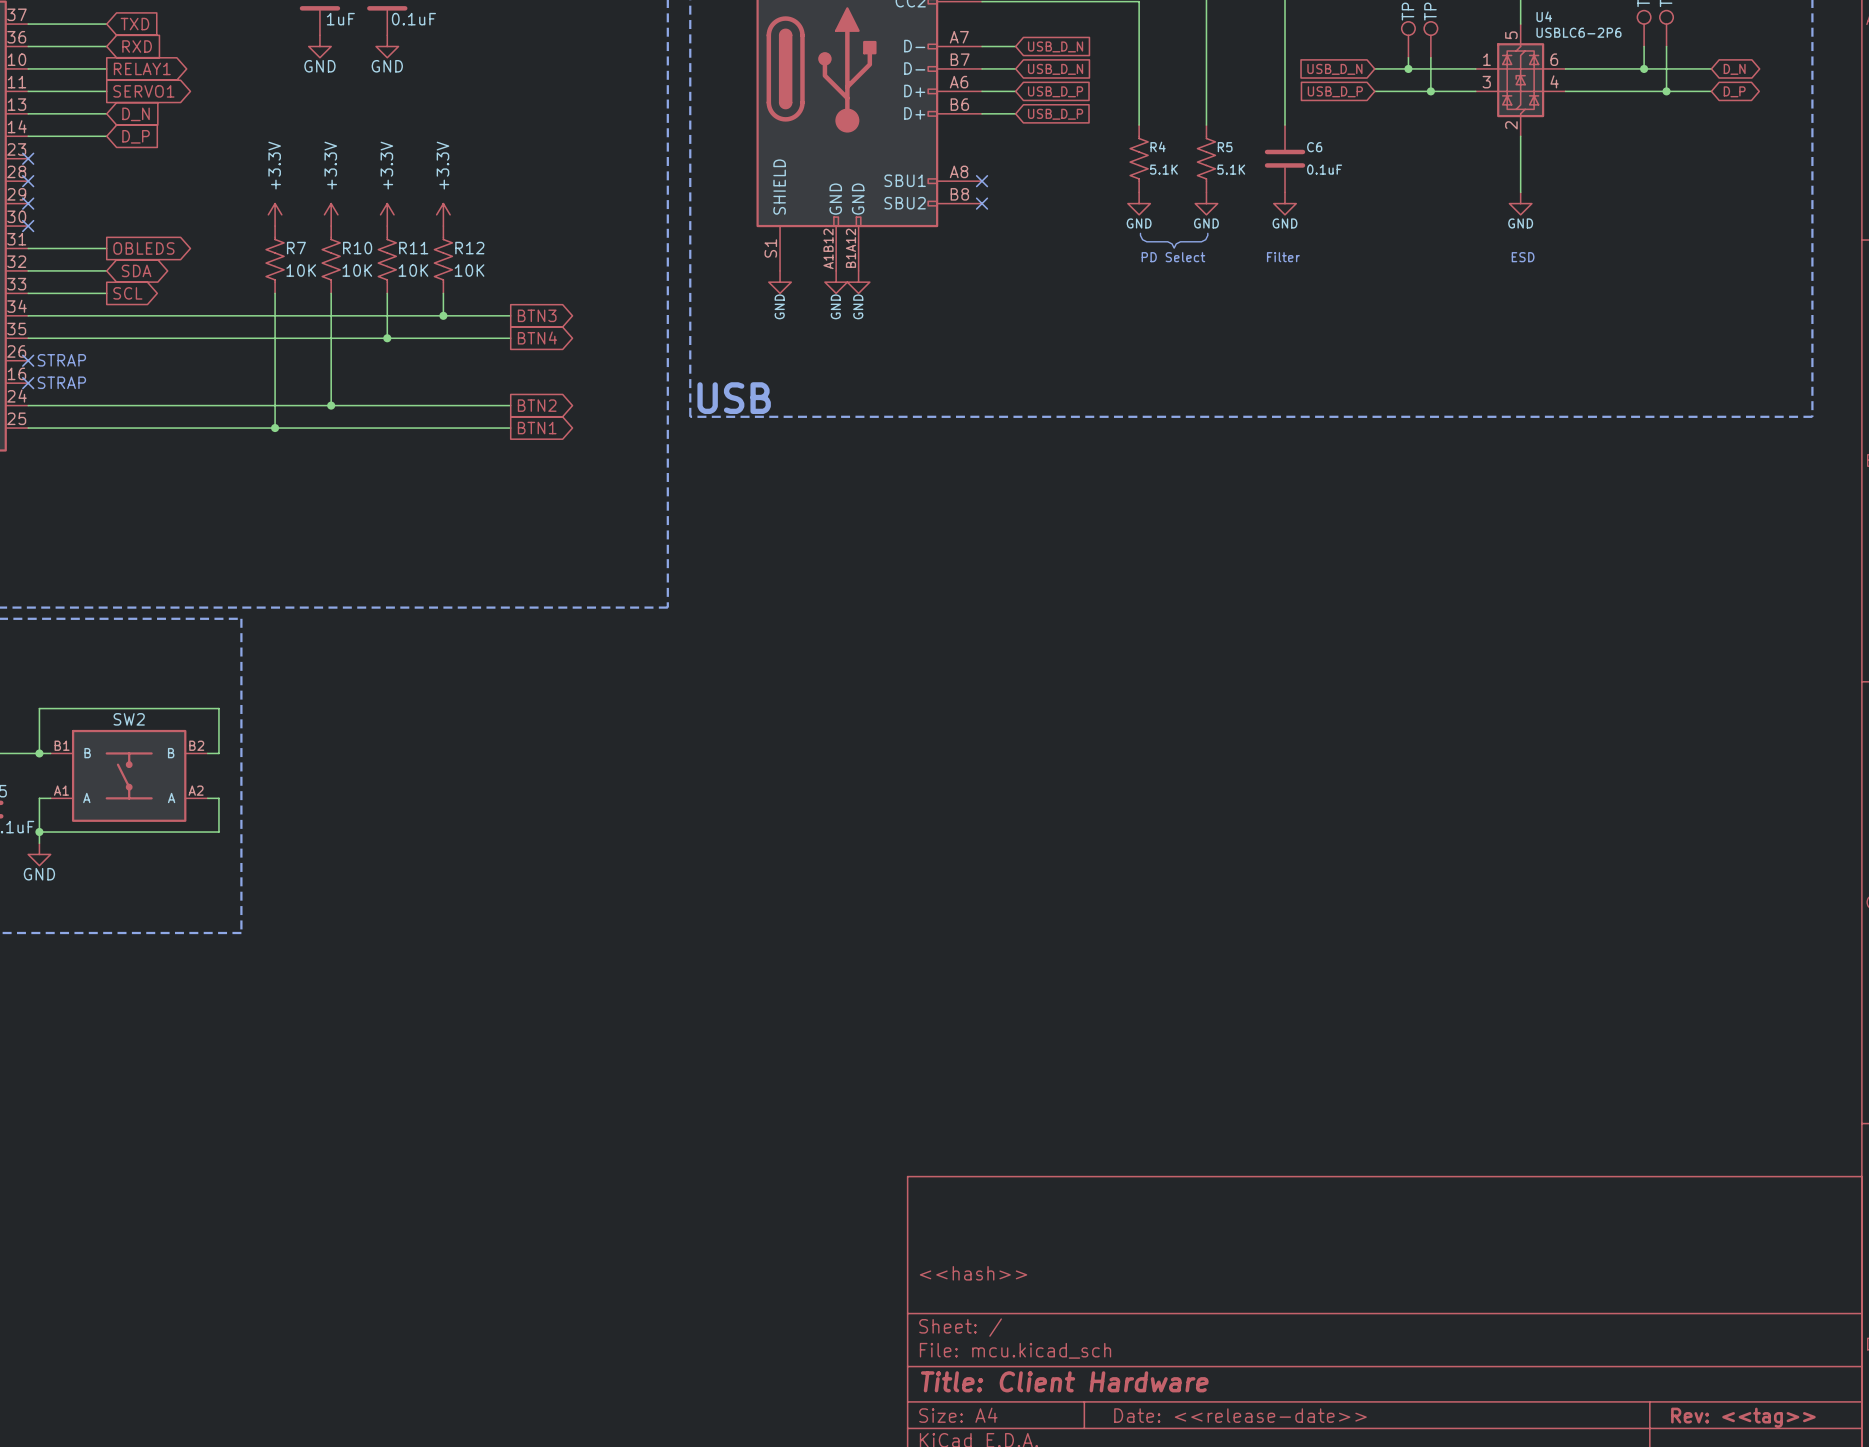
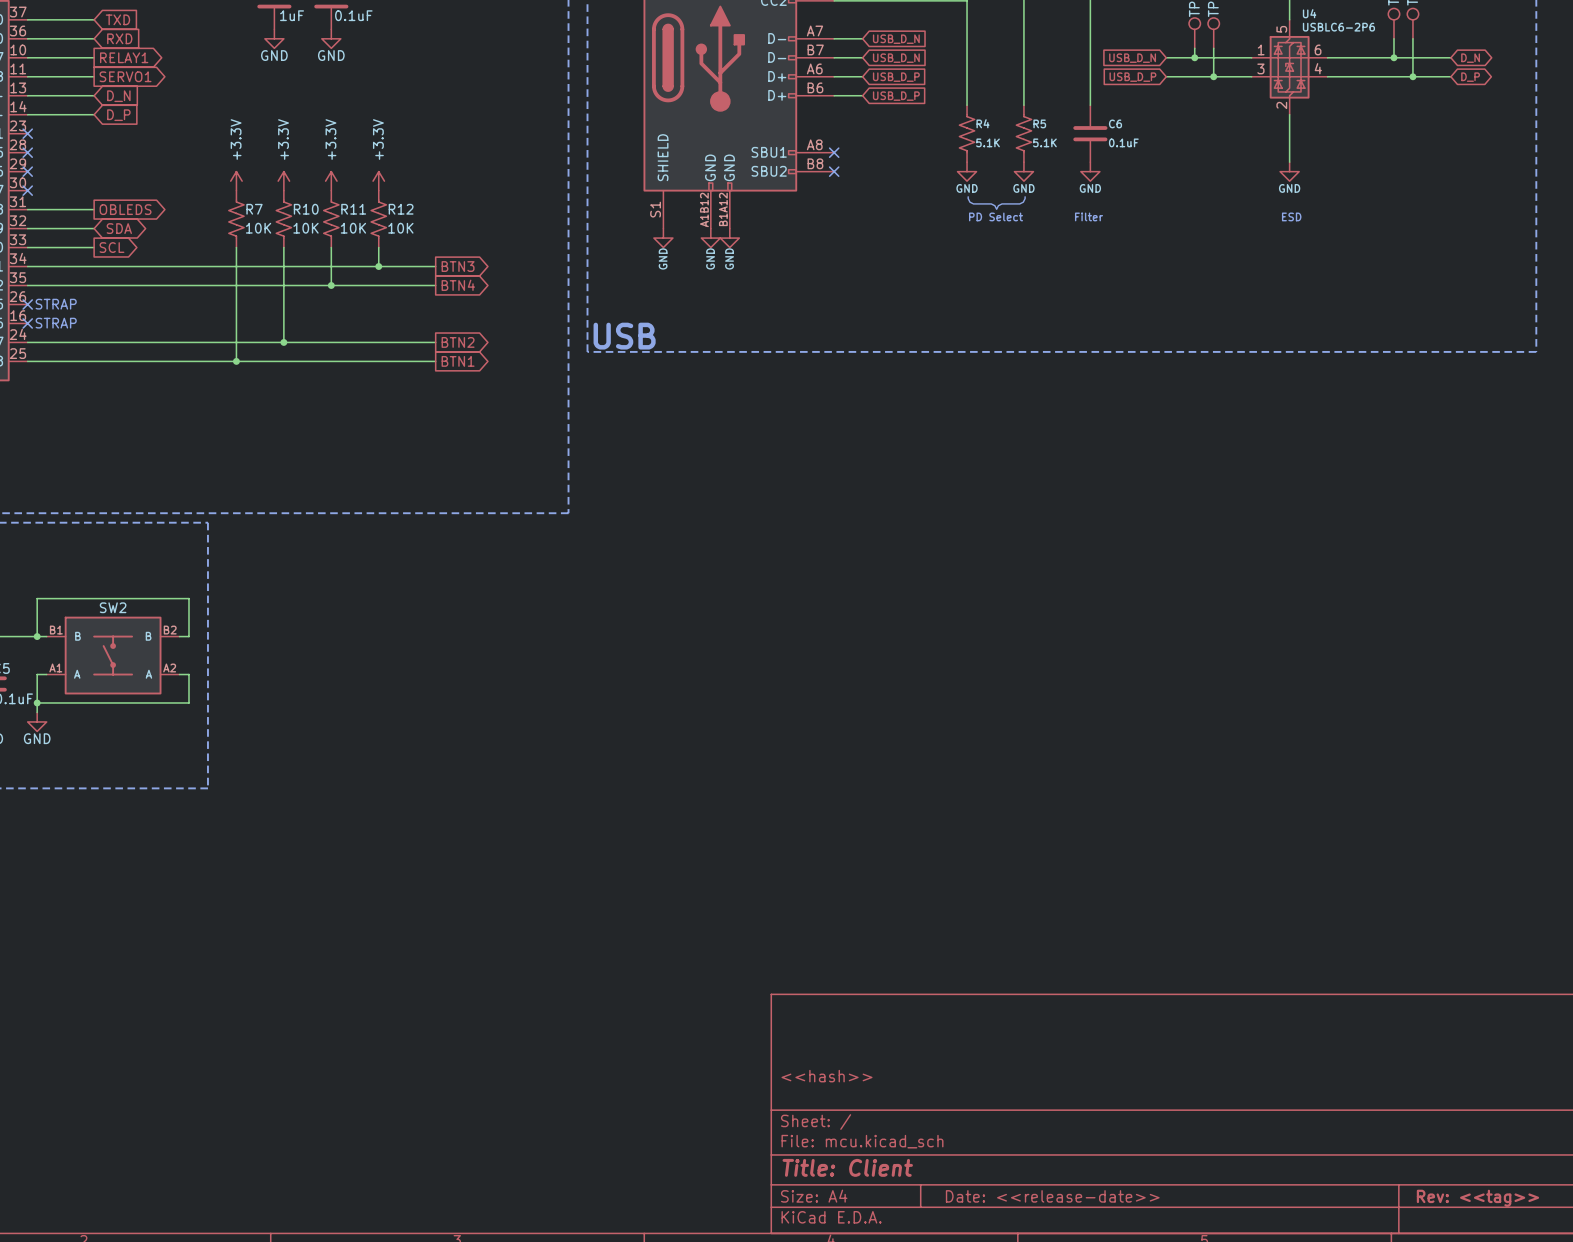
title block: Title: Client Hardware (1064, 1381) -> Title: Client (847, 1167)

